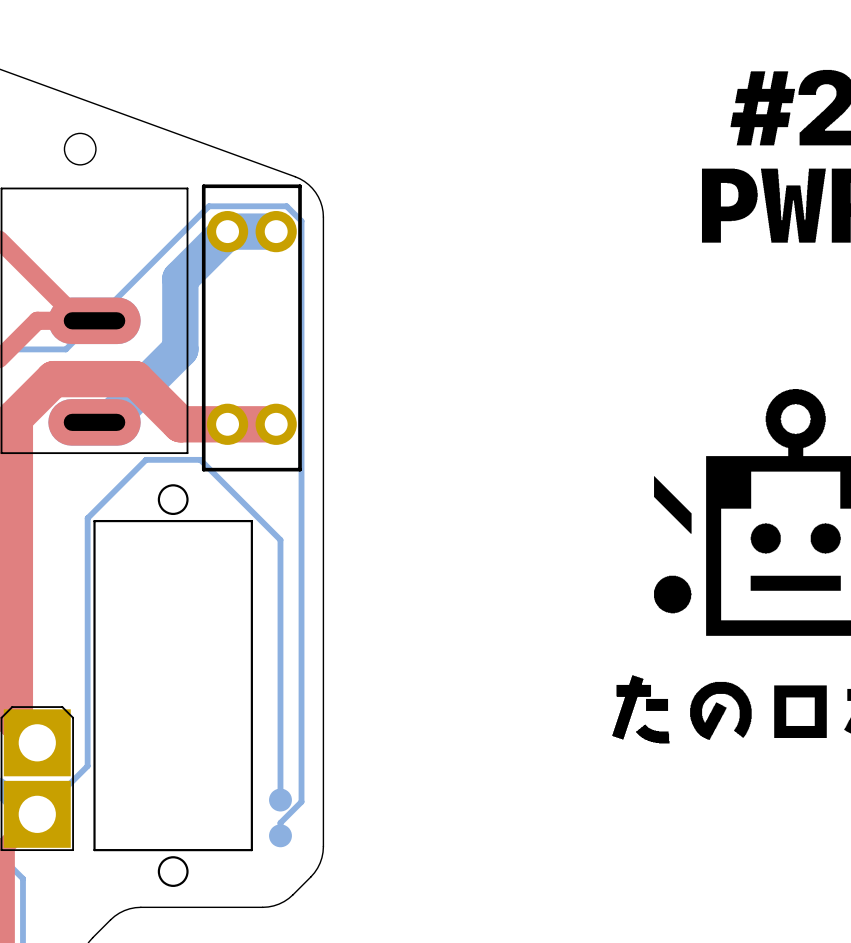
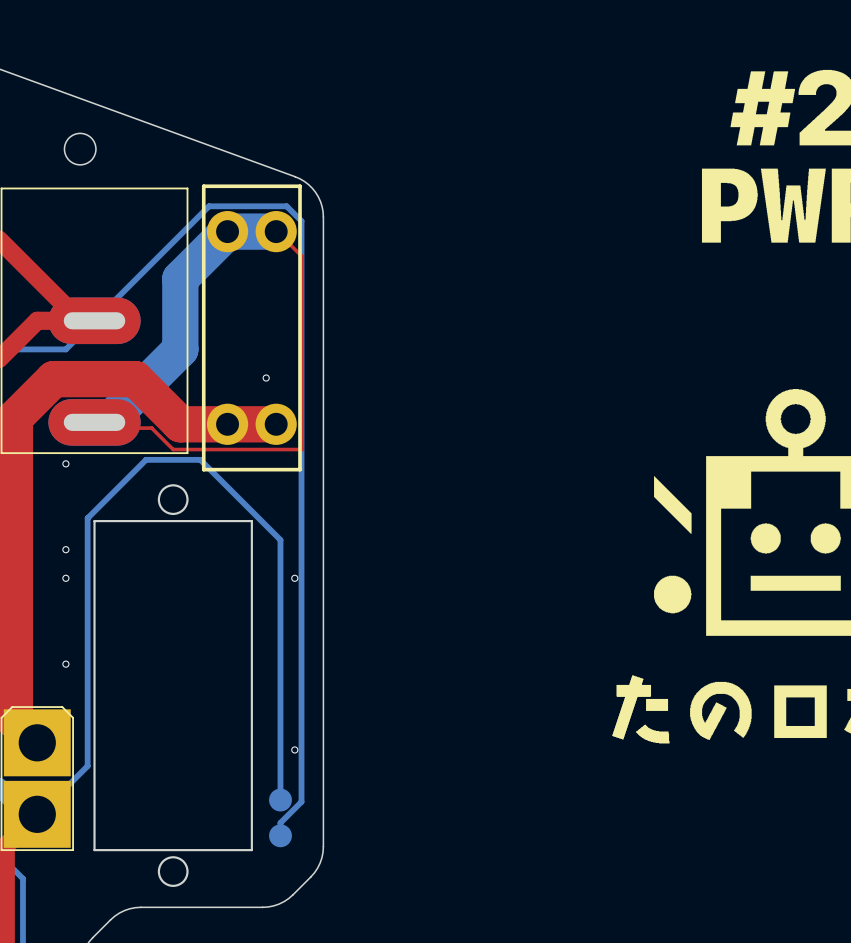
top track: none -> (276, 231) (301, 256) (301, 449) (173, 449) (151, 428) (94, 428) (94, 422)
via: none -> (266, 378)
via: none -> (65, 463)
via: none -> (65, 549)
via: none -> (65, 578)
via: none -> (294, 578)
via: none -> (65, 664)
via: none -> (294, 749)

